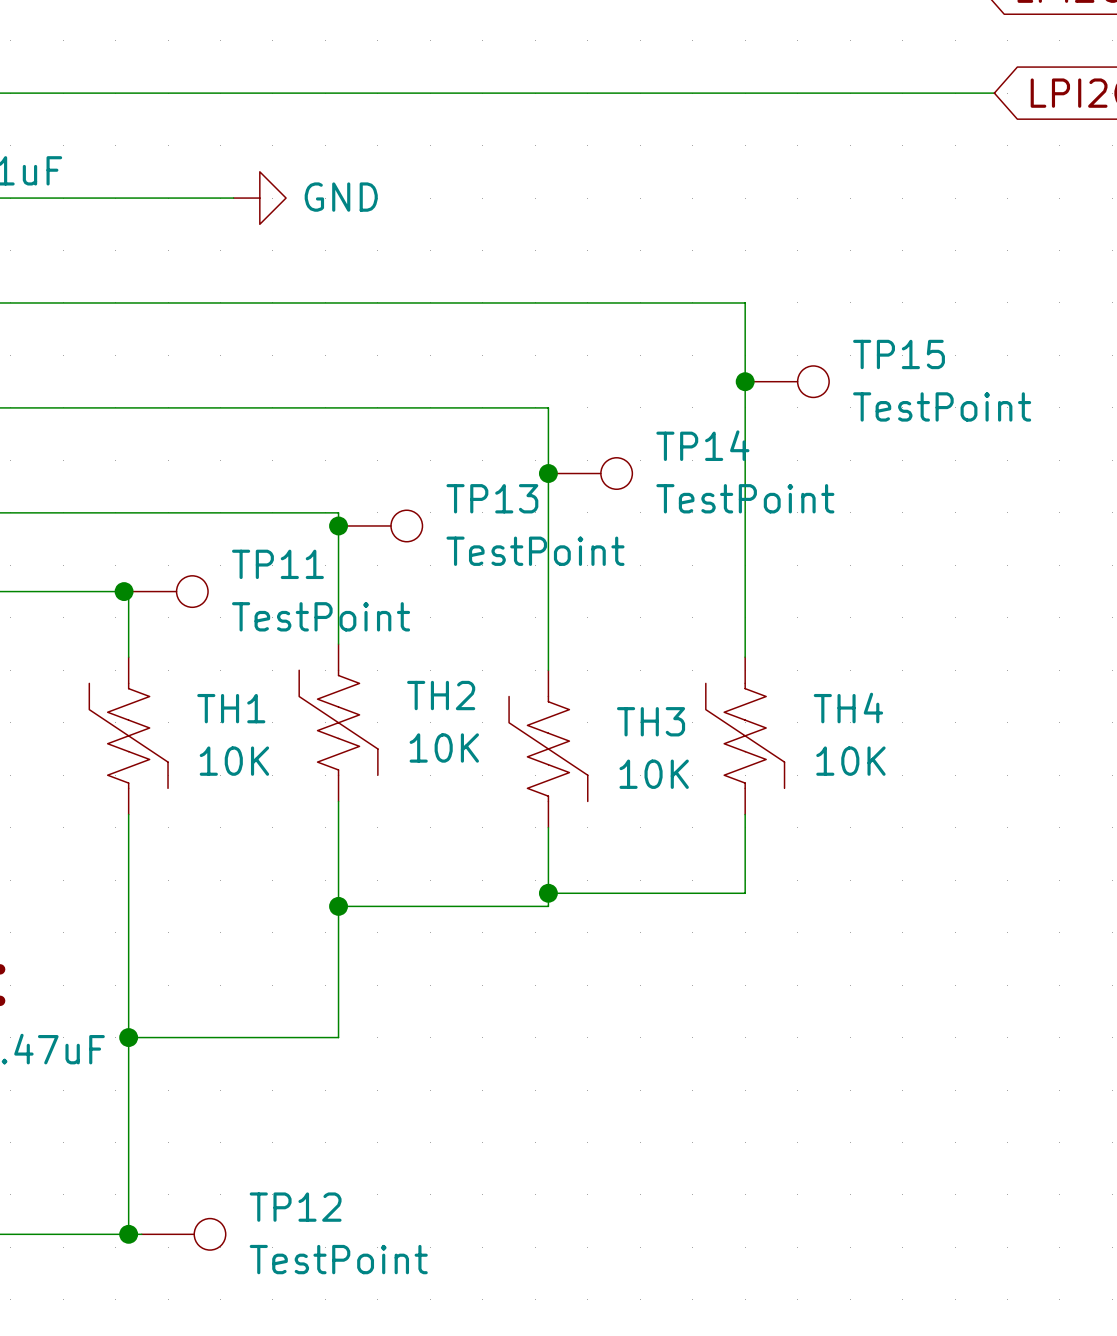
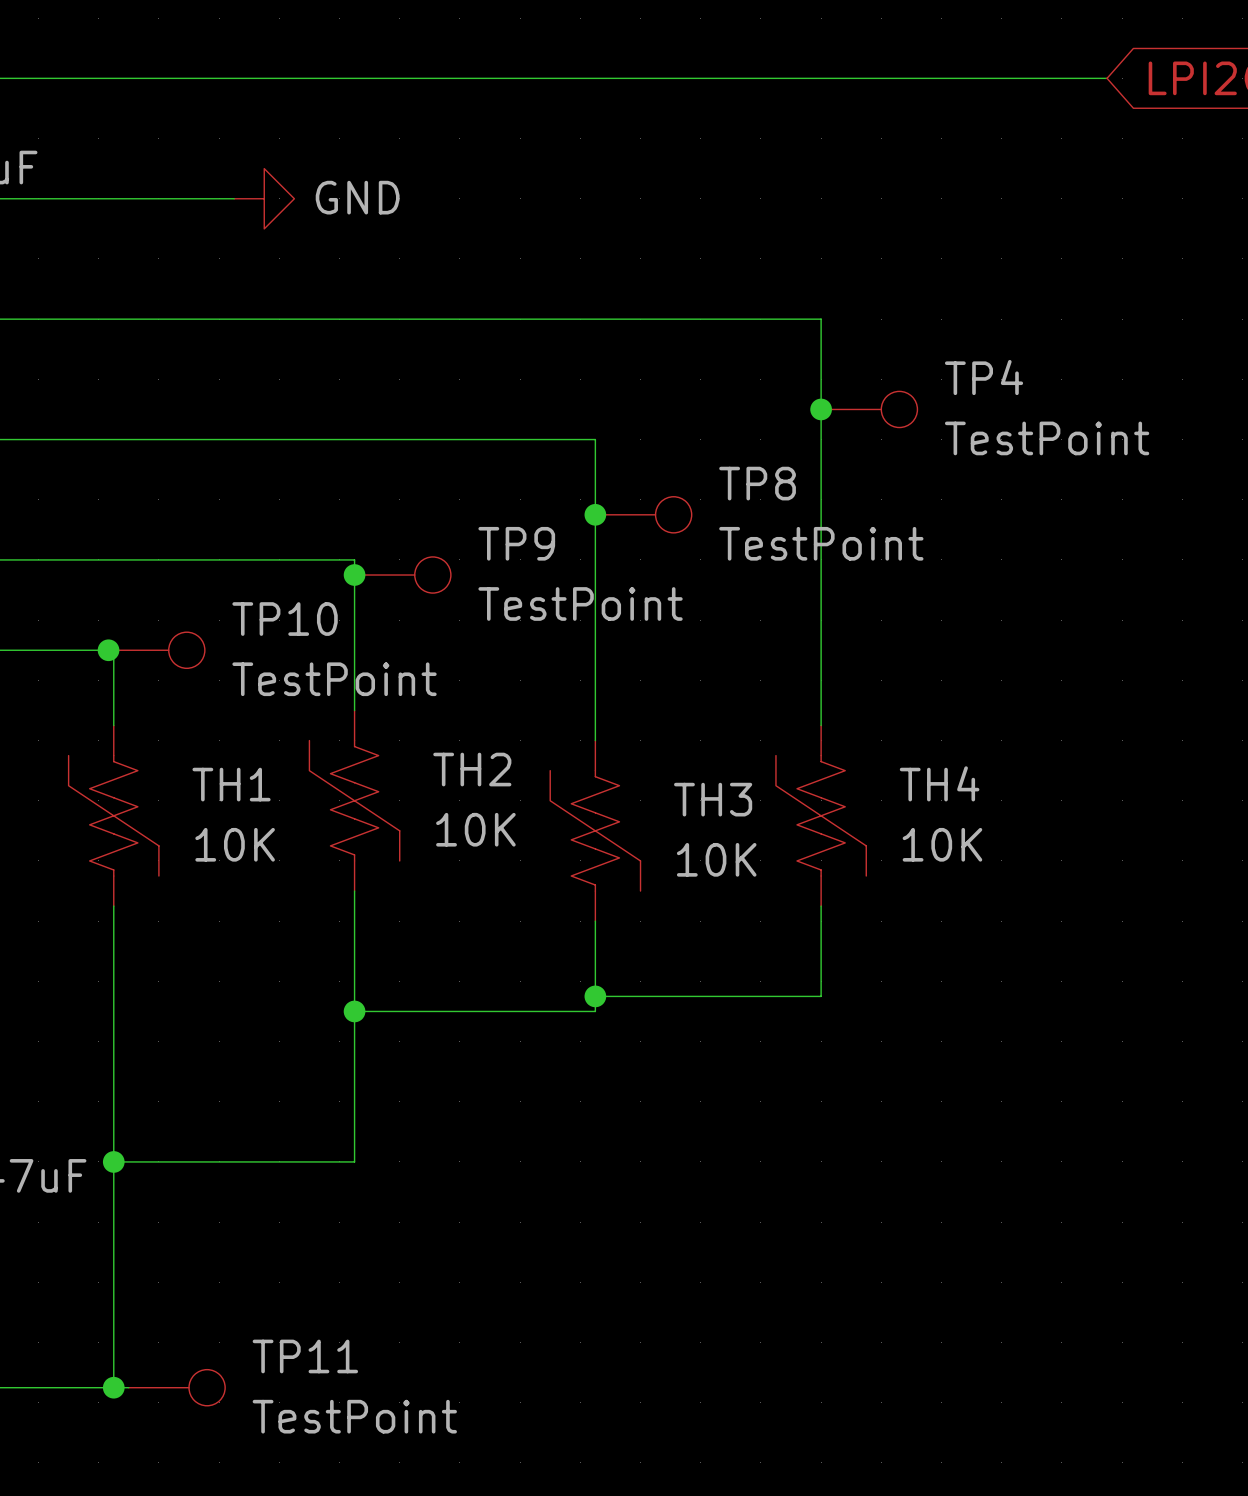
TP15 name: TP15 (899, 354) -> TP4 (984, 377)
TP14 name: TP14 (702, 445) -> TP8 (757, 483)
TP13 name: TP13 (492, 498) -> TP9 (516, 543)
TP11 name: TP11 (277, 564) -> TP10 (285, 619)
TP12 name: TP12 (295, 1207) -> TP11 (305, 1356)

